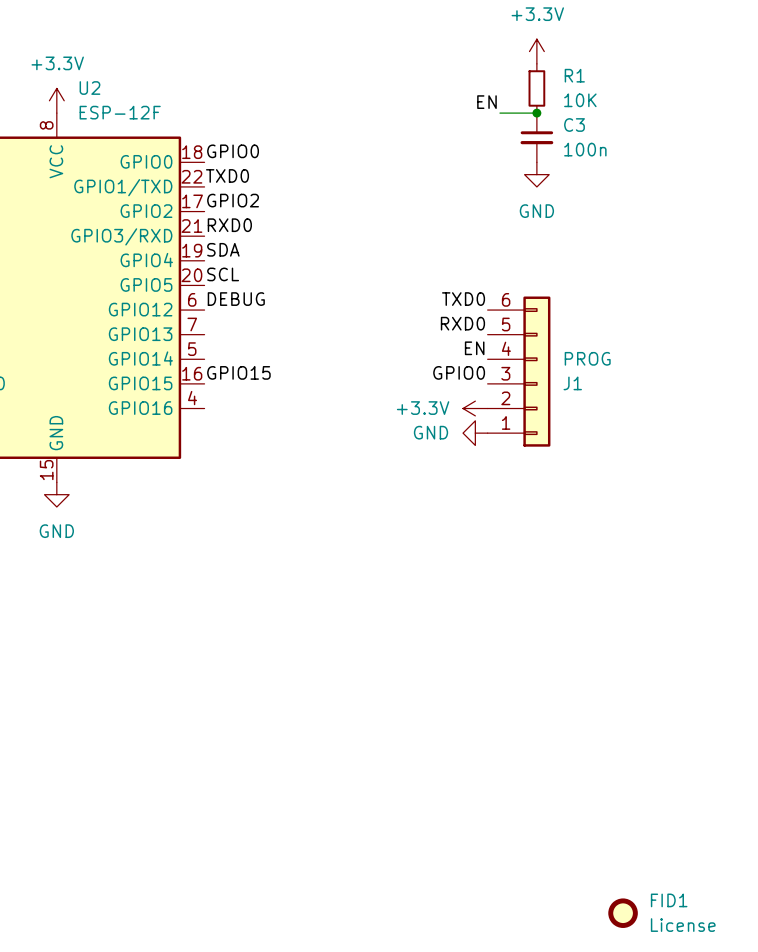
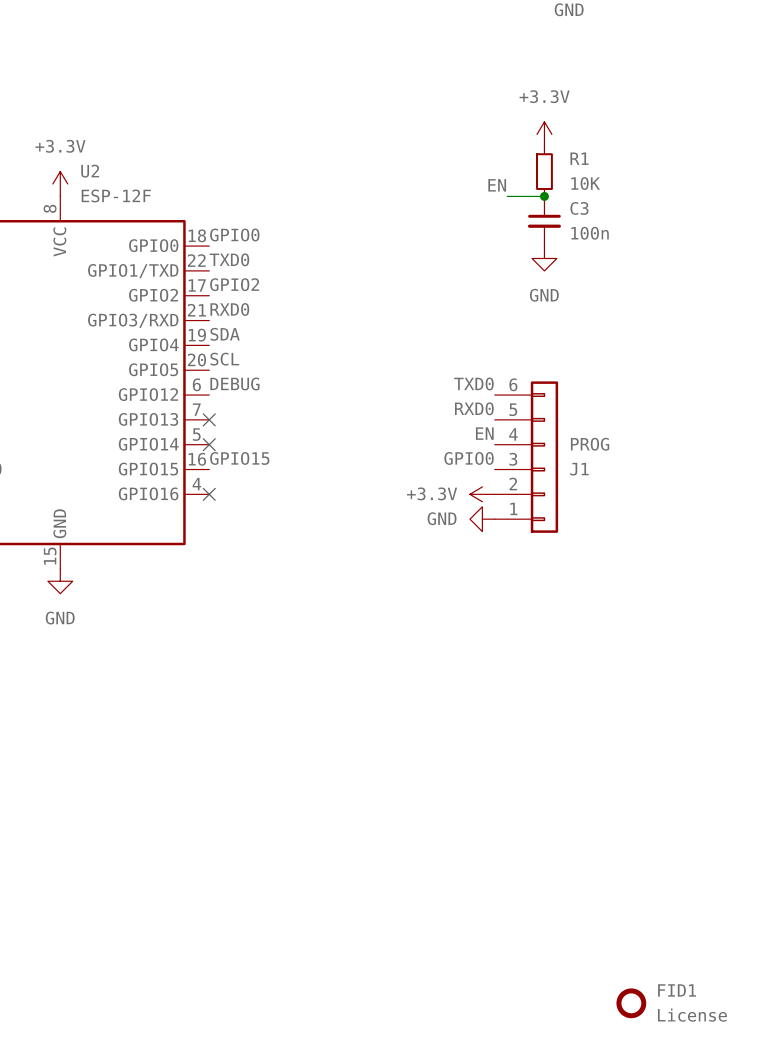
no-connect mark: none -> (209, 419)
no-connect mark: none -> (209, 444)
no-connect mark: none -> (209, 494)

